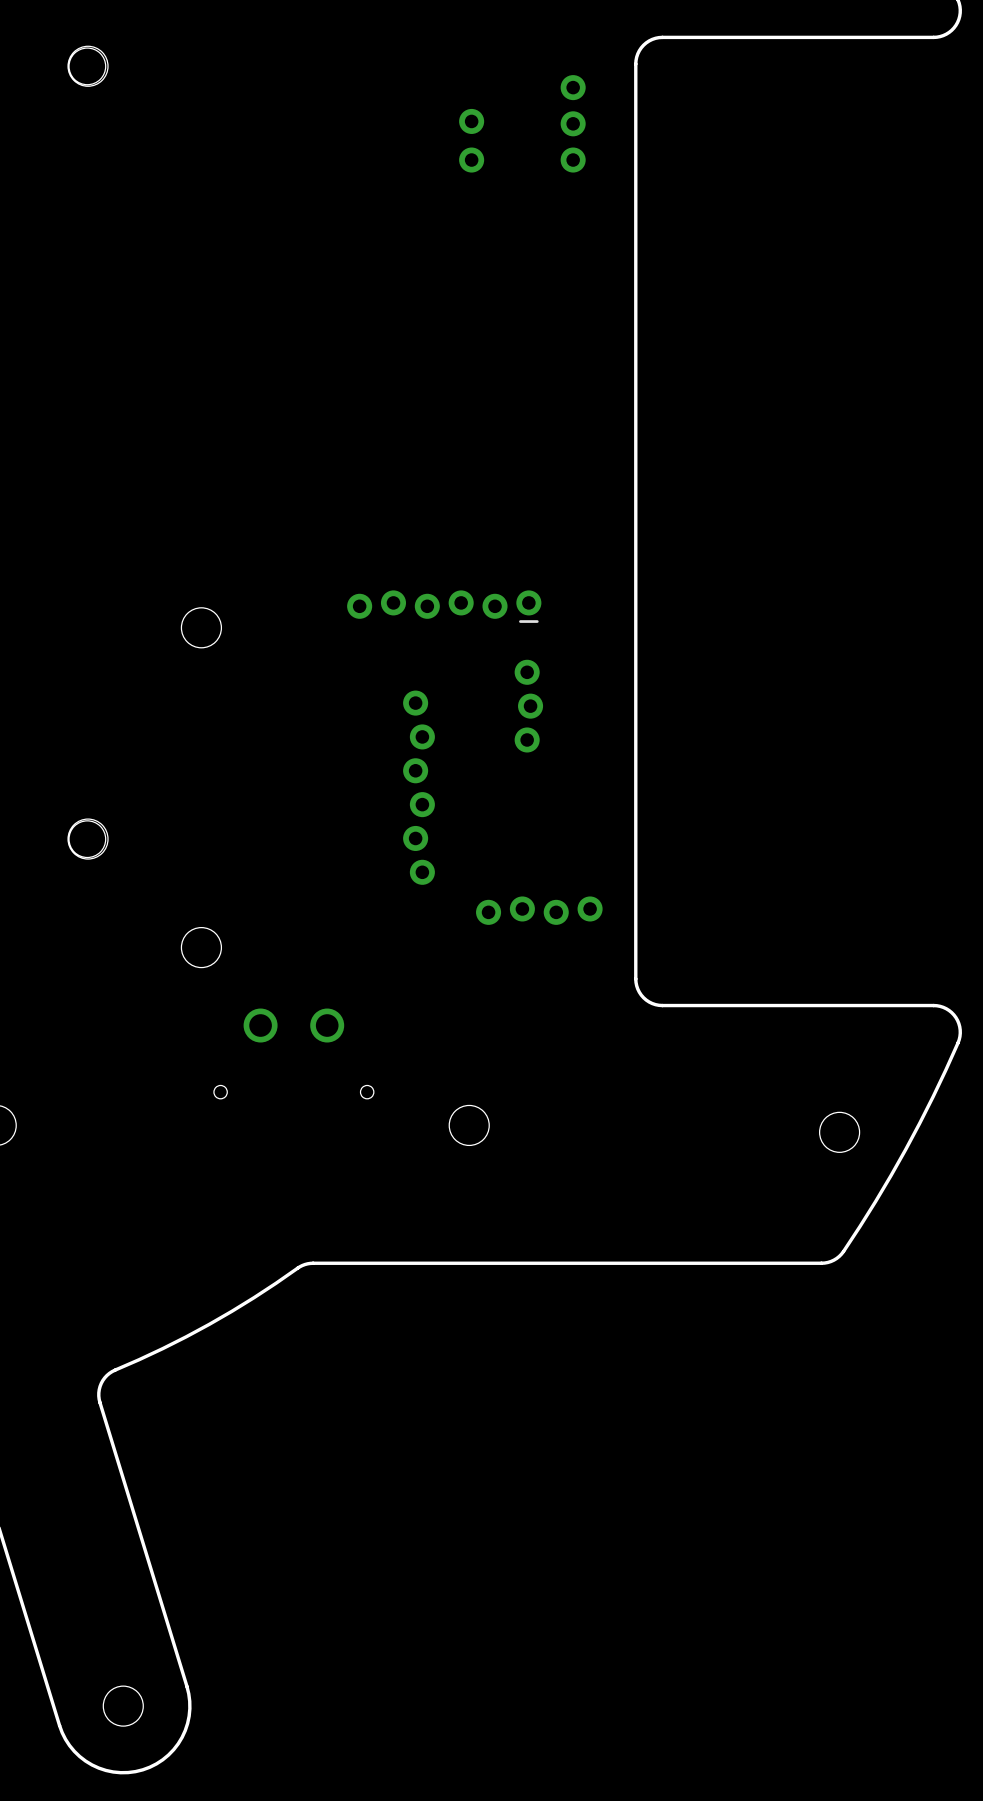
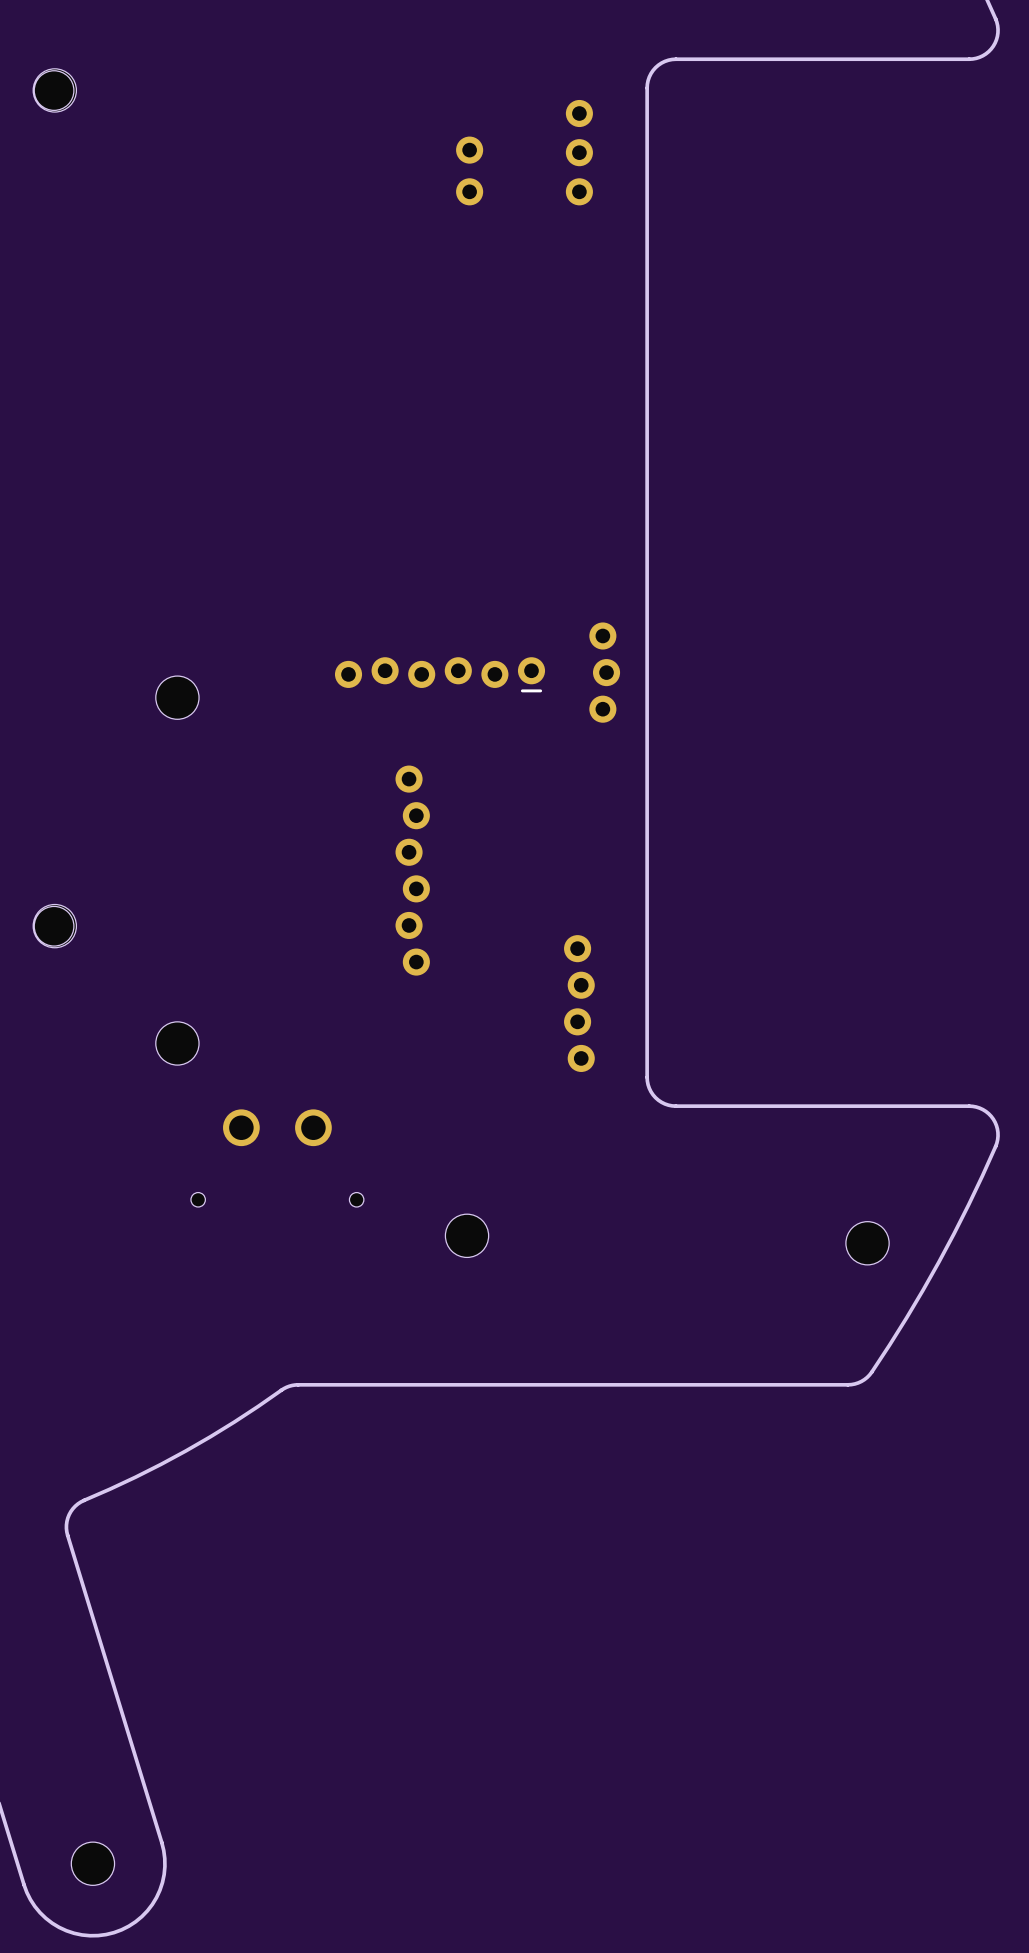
part position: (528, 706) -> (604, 672)
part rotation: 0° (539, 910) -> 90° clockwise (579, 1003)

